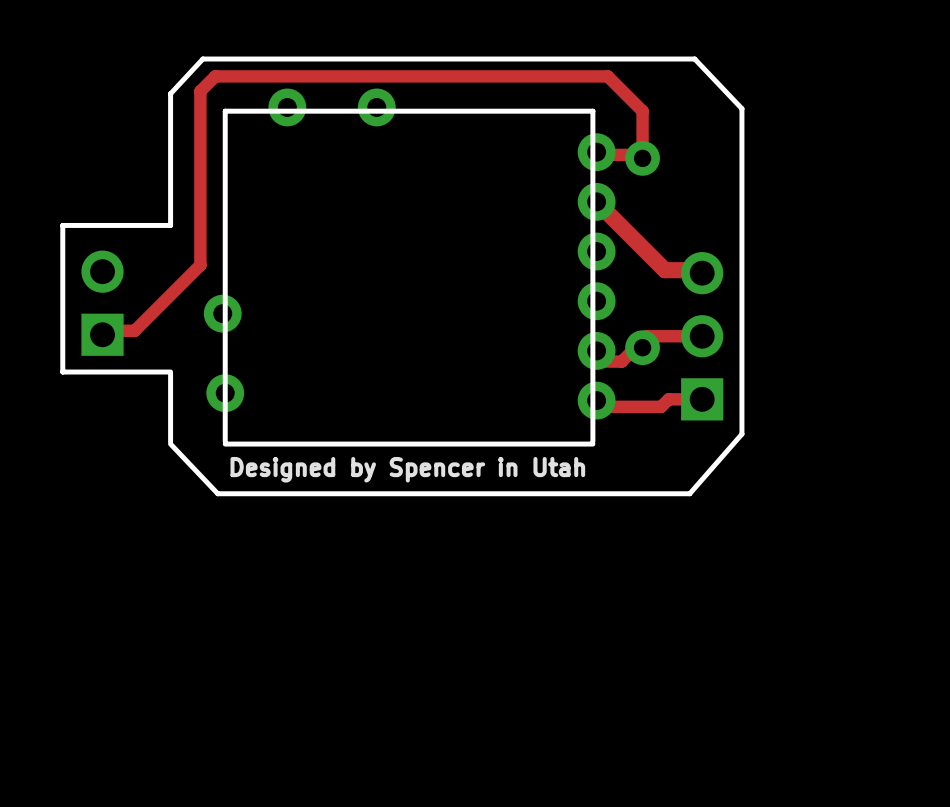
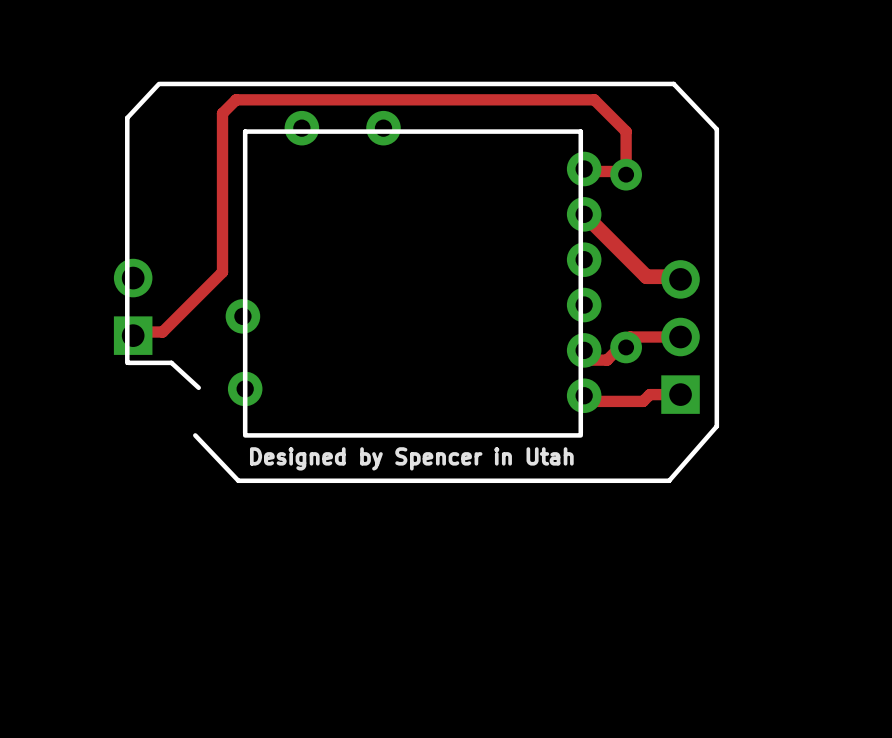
board edge: none -> (159, 83) (127, 117) (127, 362)
board edge: (202, 59) (170, 93) (170, 225) (62, 225) (62, 372) (170, 372) -> (224, 83) (160, 83)
board edge: none -> (128, 362) (171, 362) (198, 387)
board edge: (170, 374) (170, 441) -> none

